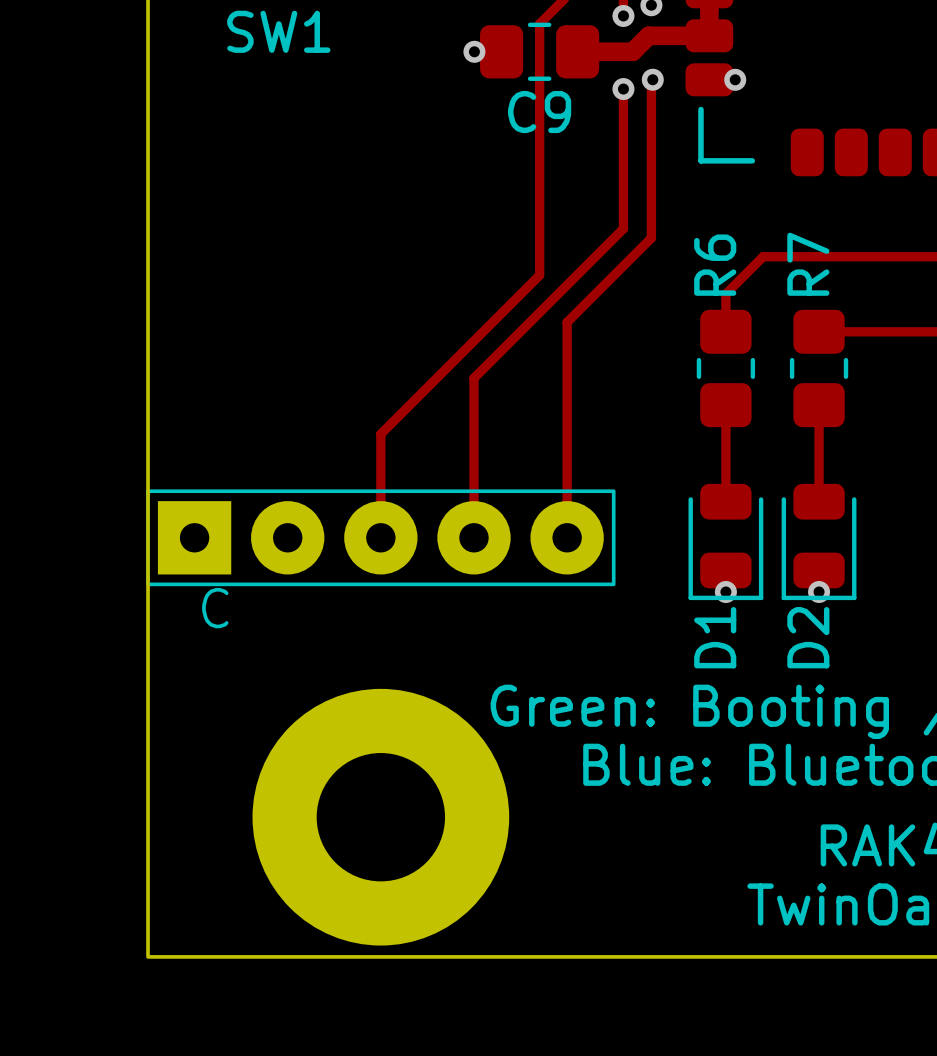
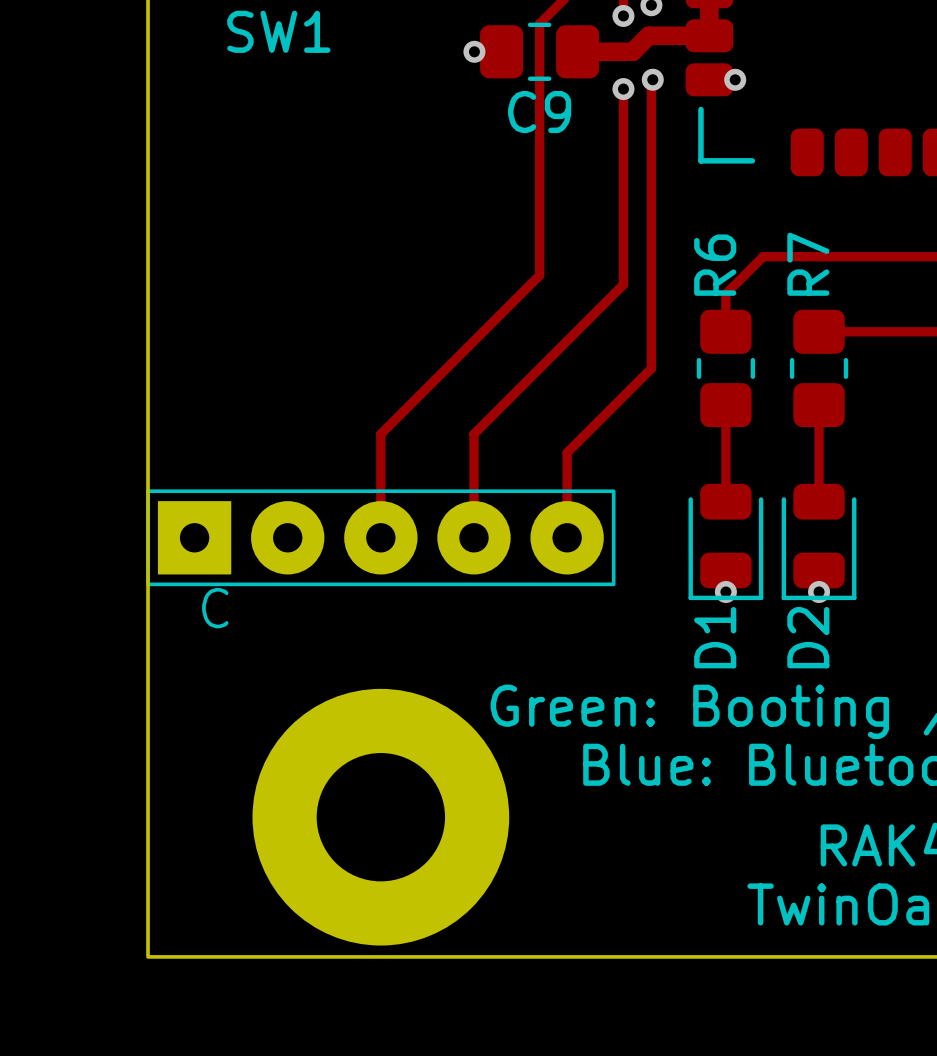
track: (623, 228) (474, 378) (474, 434) -> (623, 228) (623, 284) (474, 434)
track: (651, 238) (567, 322) (567, 452) -> (651, 238) (651, 368) (567, 452)

